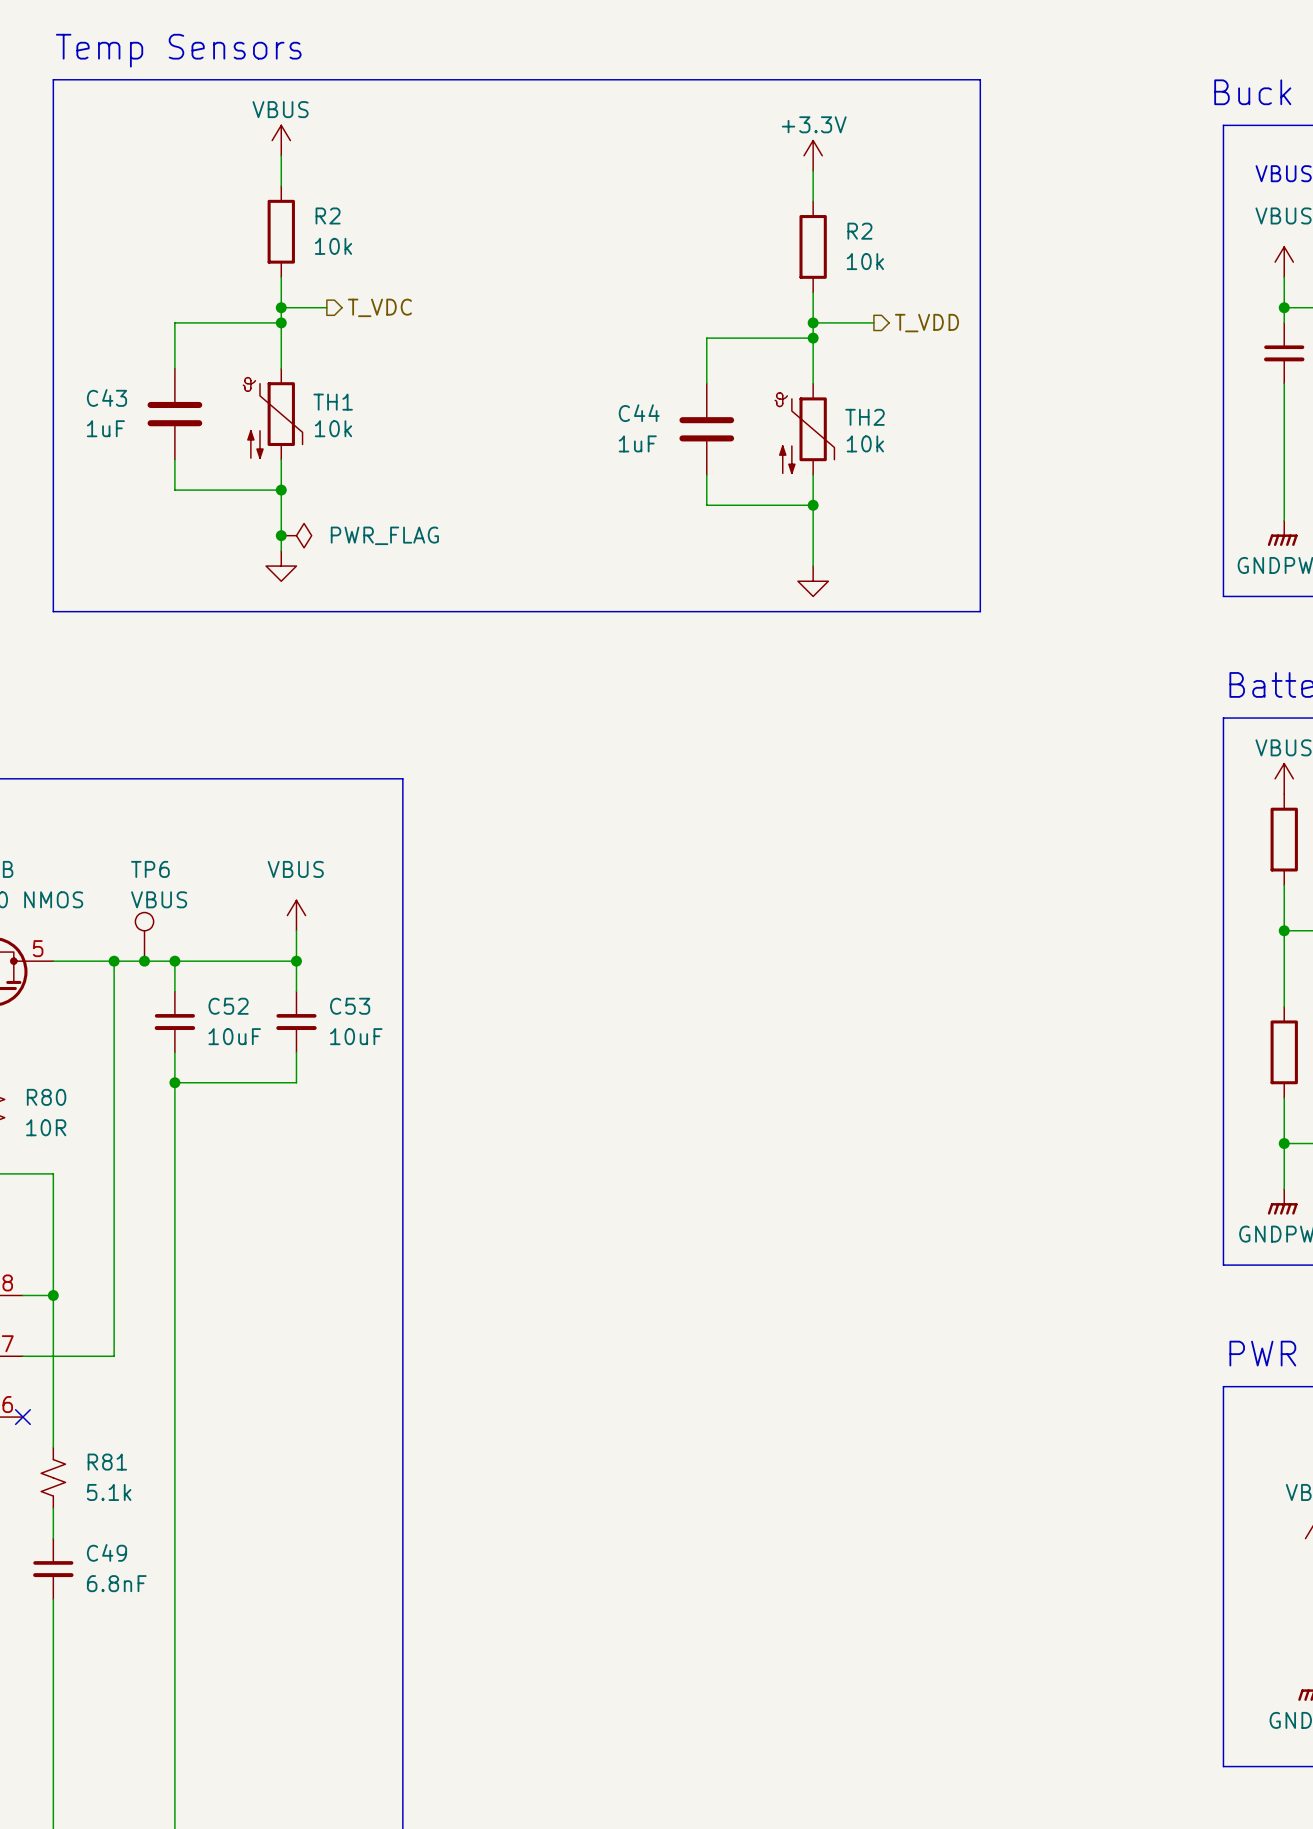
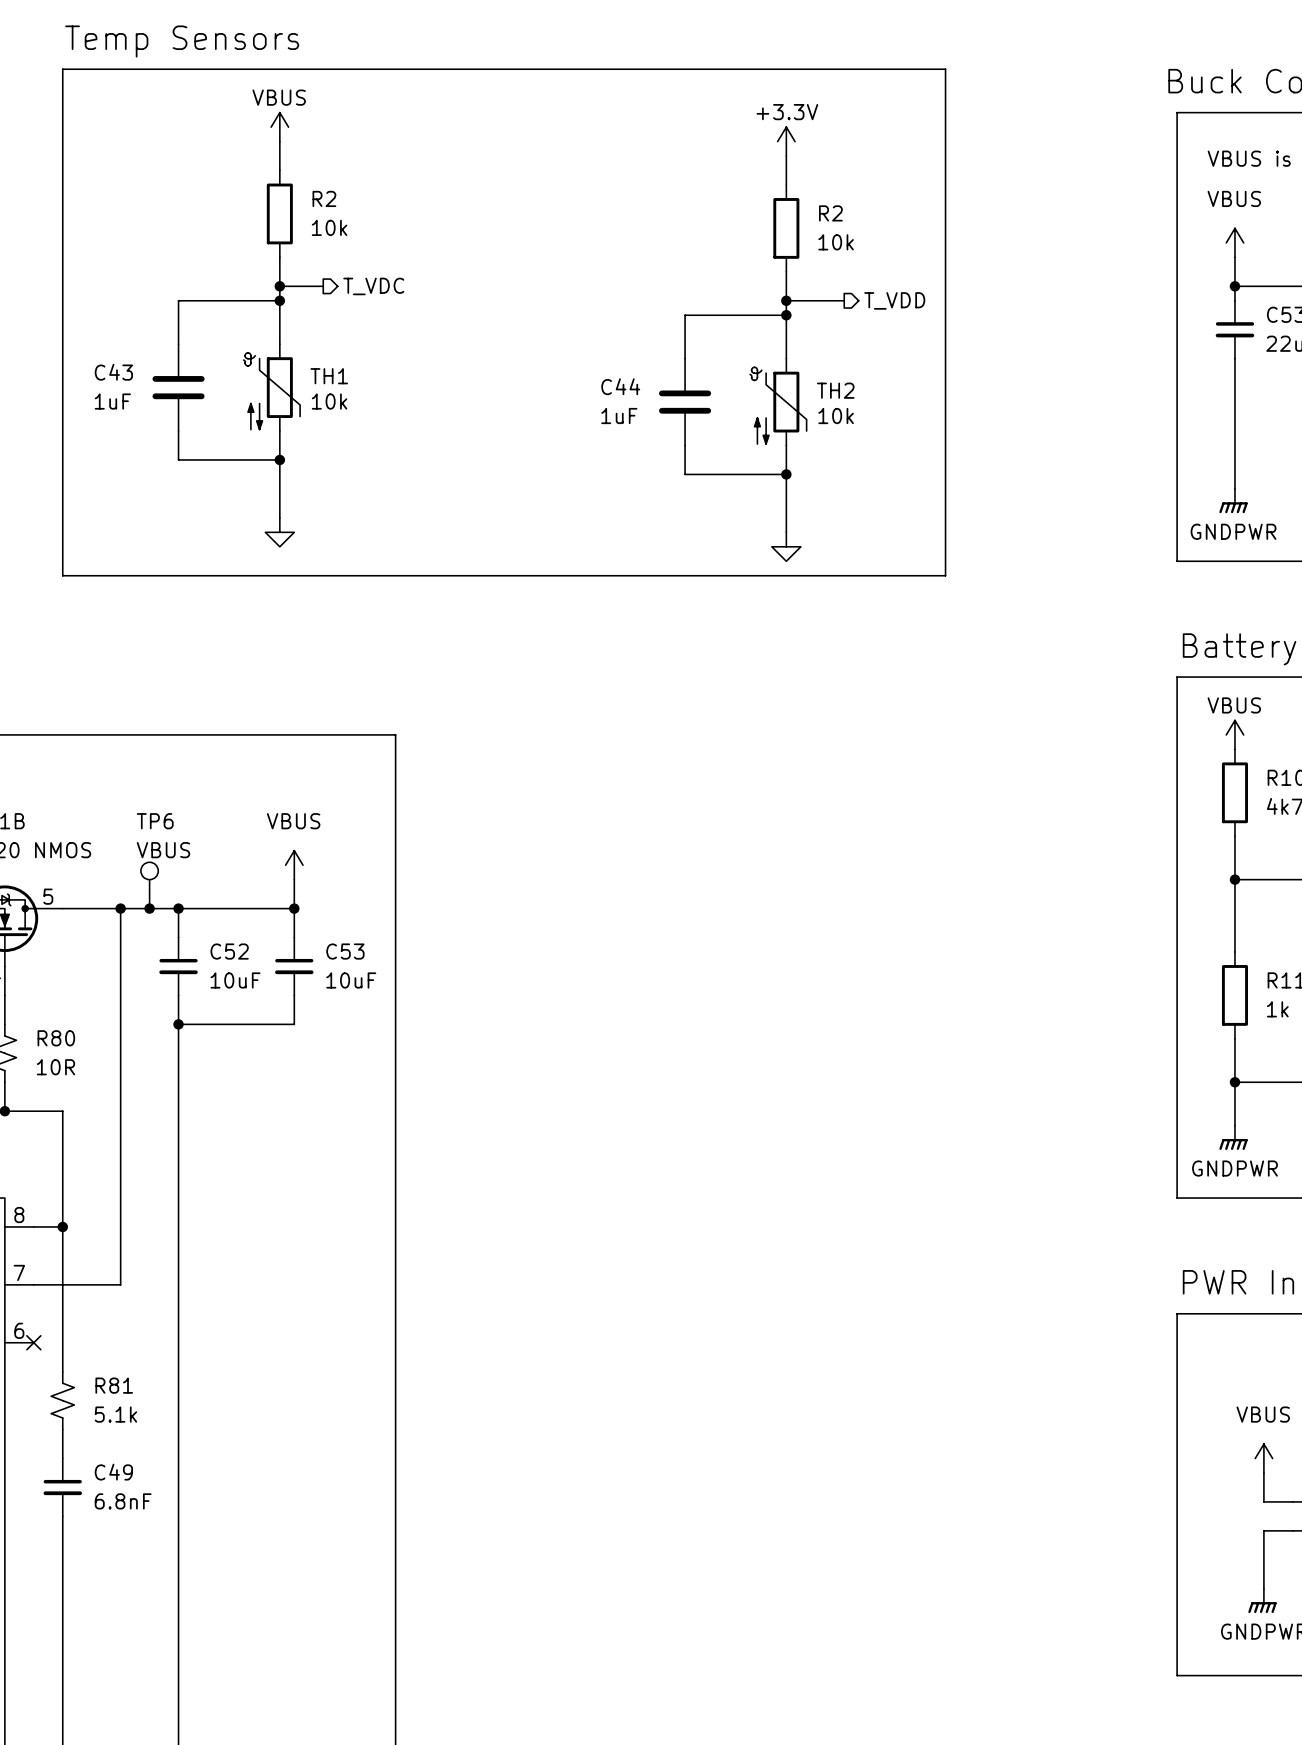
junction: (281, 535) -> none
power symbol: PWR_FLAG (296, 535) -> none

